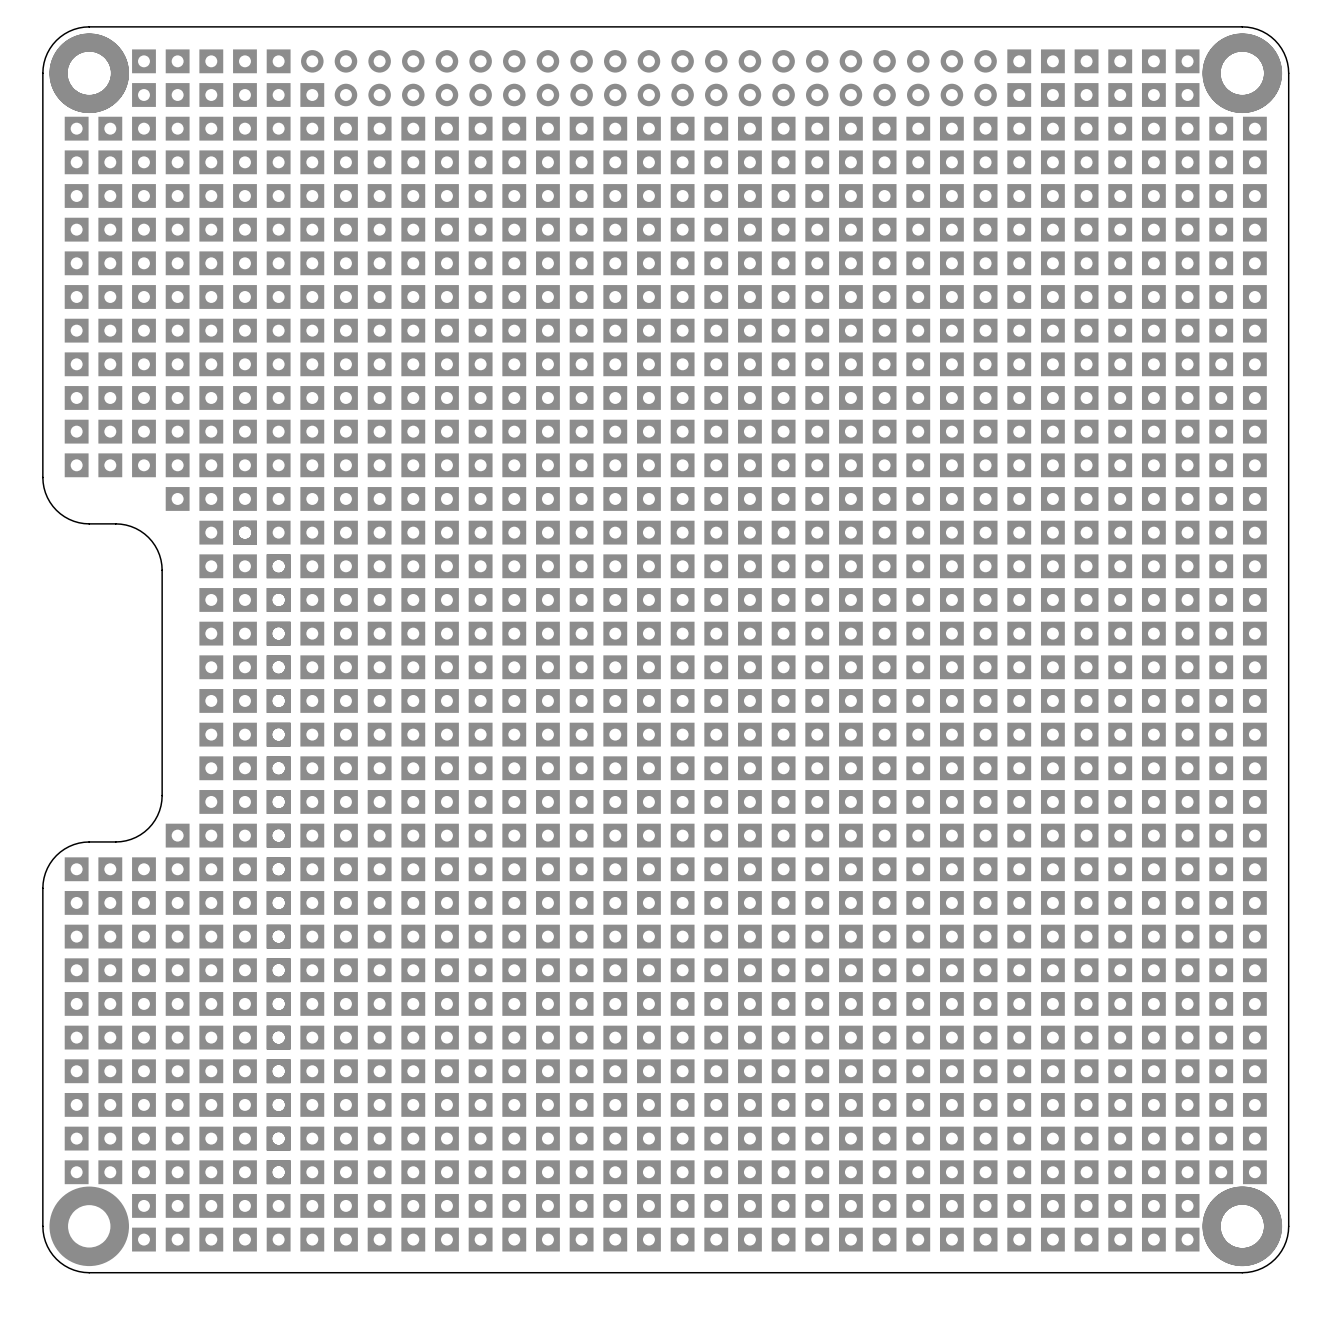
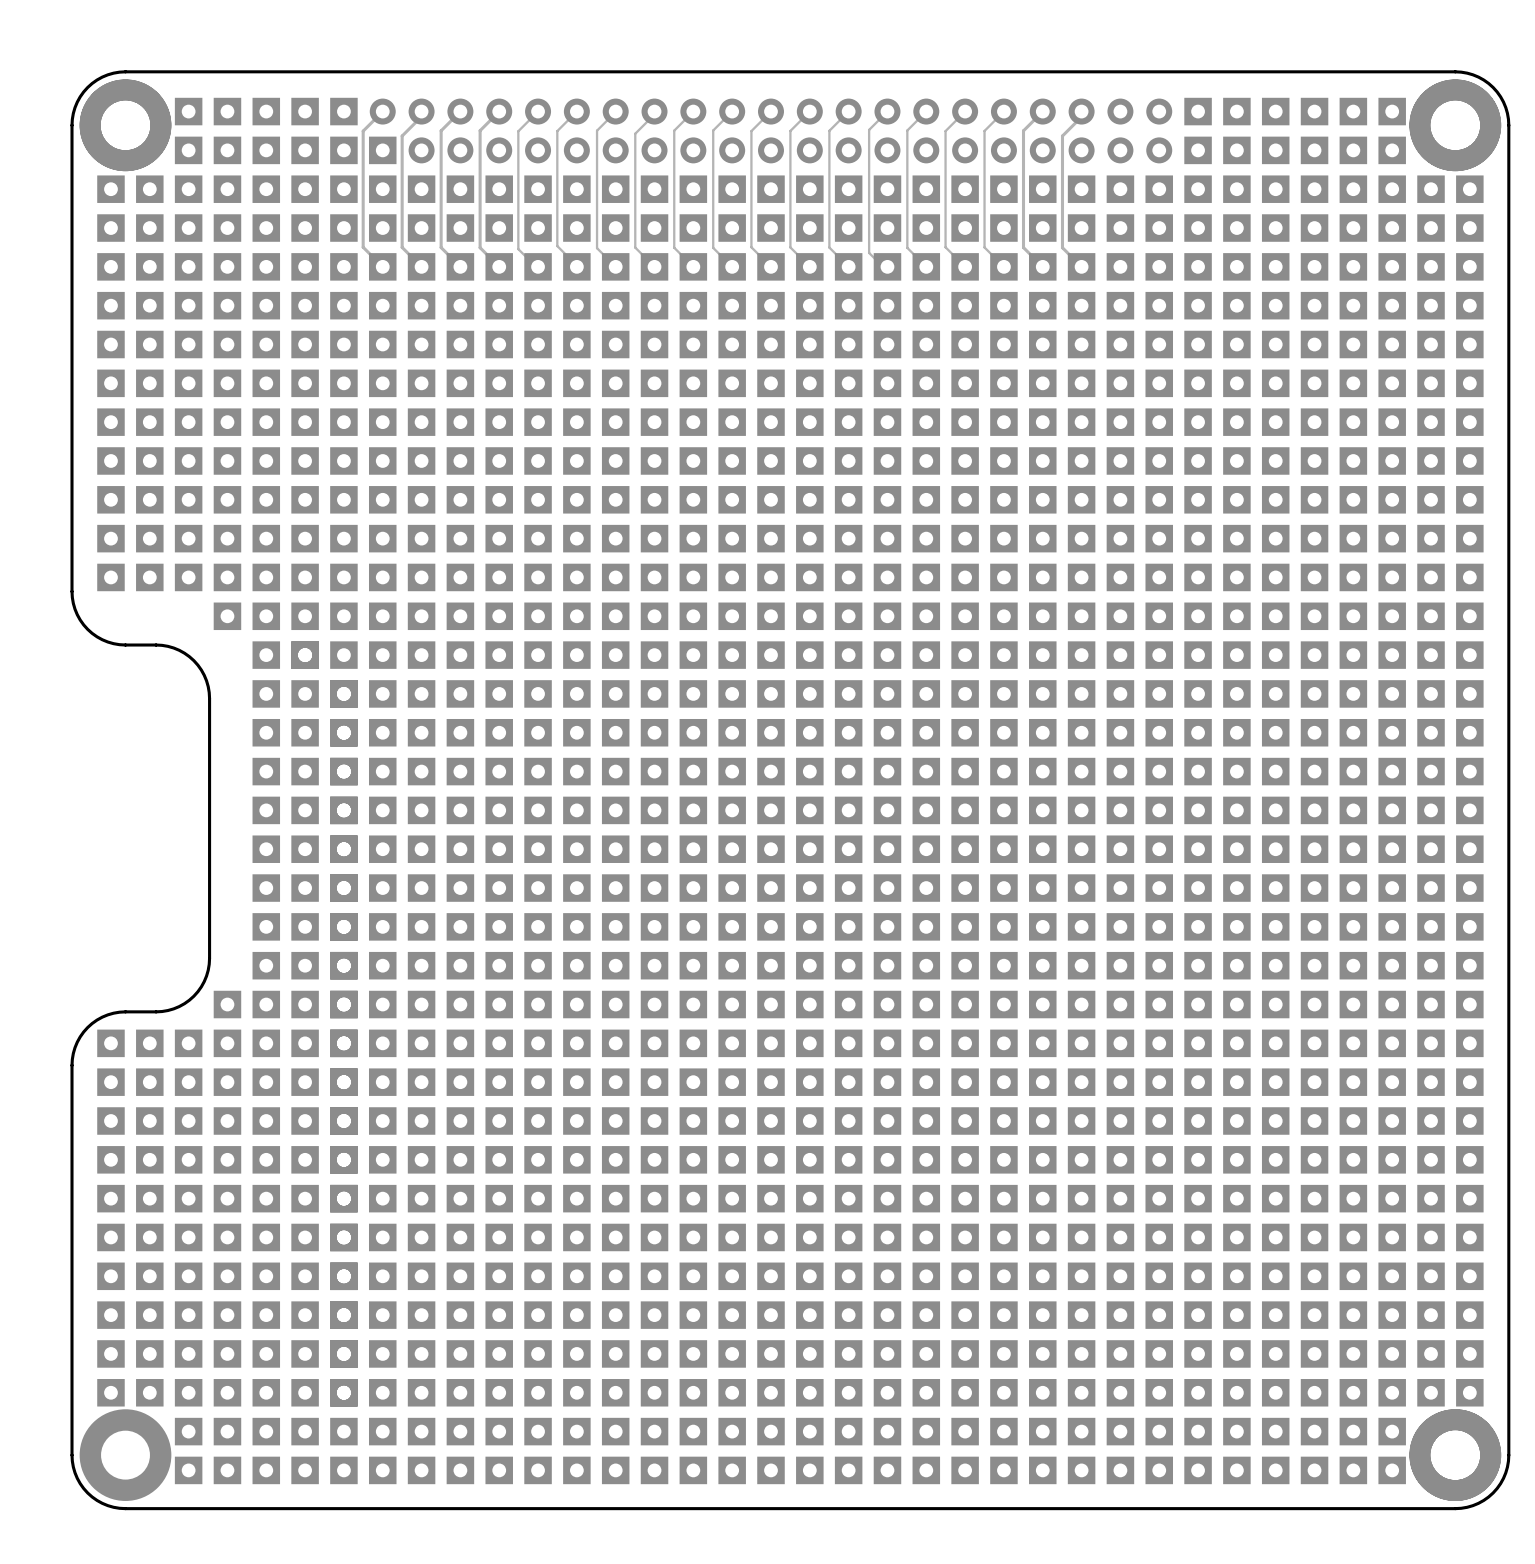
line: none -> (1455, 71) (125, 71) (107, 74) (87, 87) (77, 102) (72, 125) (72, 597) (80, 619) (97, 636) (119, 644) (162, 645) (173, 648) (193, 660) (206, 680) (209, 698) (209, 958) (206, 976) (201, 986) (184, 1003) (162, 1011) (119, 1012) (102, 1017) (83, 1032) (73, 1053) (72, 1455) (75, 1472) (87, 1492) (107, 1505) (125, 1508) (1455, 1508) (1472, 1505) (1493, 1492) (1505, 1472) (1508, 1455) (1508, 125) (1505, 107) (1493, 87) (1478, 77) (1455, 71)
track: none -> (382, 111) (363, 131) (363, 247) (382, 266)
track: none -> (421, 111) (421, 116) (402, 136) (402, 247) (421, 266)
track: none -> (460, 111) (441, 130) (441, 247) (460, 266)
track: none -> (499, 111) (480, 130) (480, 247) (499, 266)
track: none -> (538, 111) (518, 131) (518, 249) (538, 266)
track: none -> (576, 111) (557, 131) (557, 246) (576, 266)
track: none -> (615, 111) (597, 130) (597, 248) (615, 266)
track: none -> (654, 111) (654, 114) (635, 133) (635, 247) (654, 266)
track: none -> (693, 111) (674, 130) (674, 247) (693, 266)
track: none -> (732, 111) (713, 130) (713, 247) (732, 266)
track: none -> (770, 111) (751, 131) (751, 247) (770, 266)
track: none -> (809, 111) (790, 130) (790, 247) (809, 266)
track: none -> (848, 111) (829, 130) (829, 247) (848, 266)
track: none -> (887, 111) (869, 129) (869, 252) (883, 266) (887, 266)
track: none -> (926, 111) (907, 130) (907, 247) (926, 266)
track: none -> (965, 111) (945, 131) (945, 247) (965, 266)
track: none -> (1003, 111) (984, 130) (984, 247) (1003, 266)
track: none -> (1042, 111) (1023, 130) (1023, 247) (1042, 266)
track: none -> (1081, 111) (1081, 116) (1062, 136) (1062, 247) (1081, 266)

